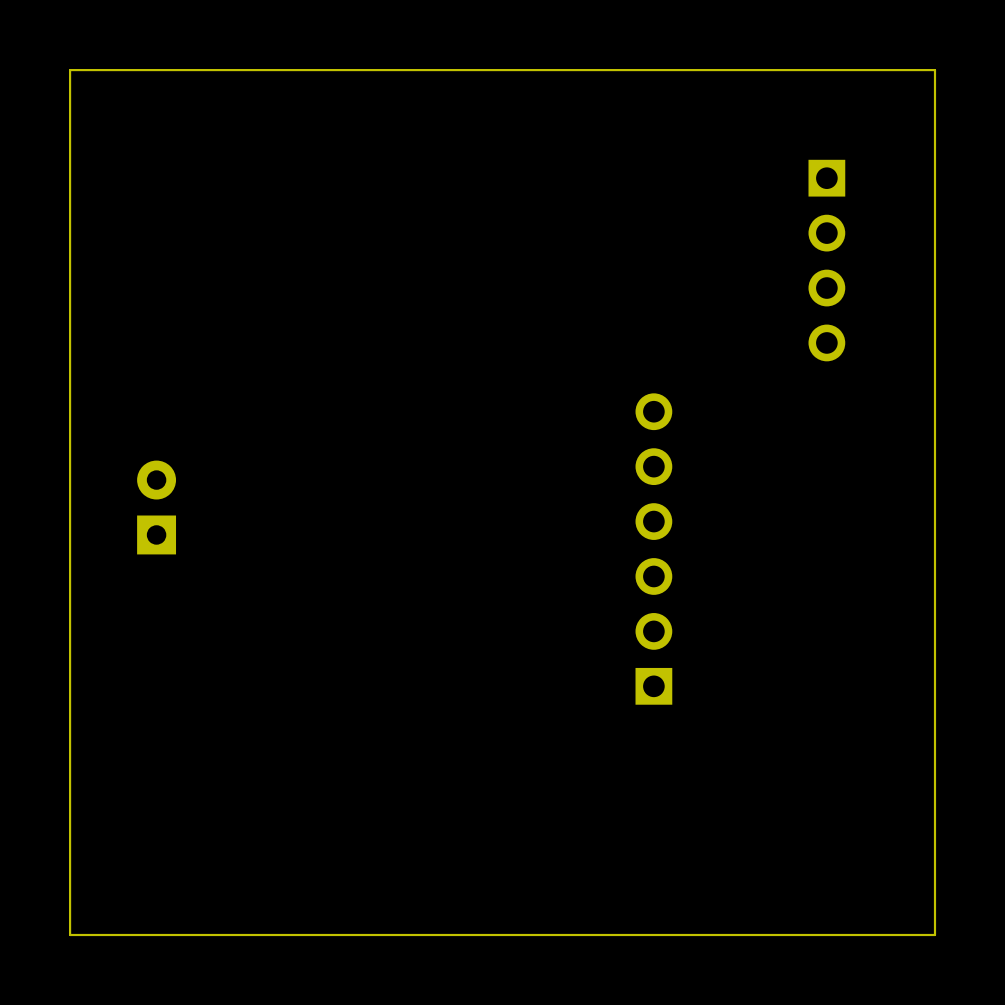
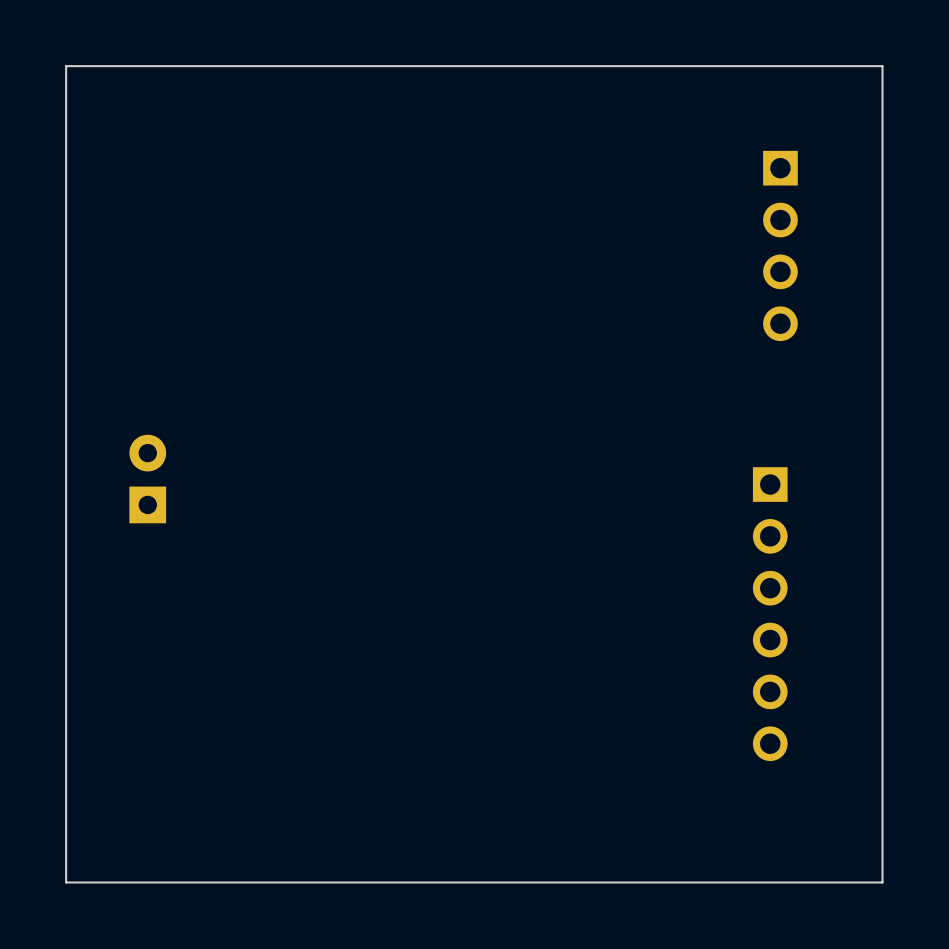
part rotation: 0° (653, 549) -> 180° (770, 614)
part position: (653, 549) -> (770, 614)

